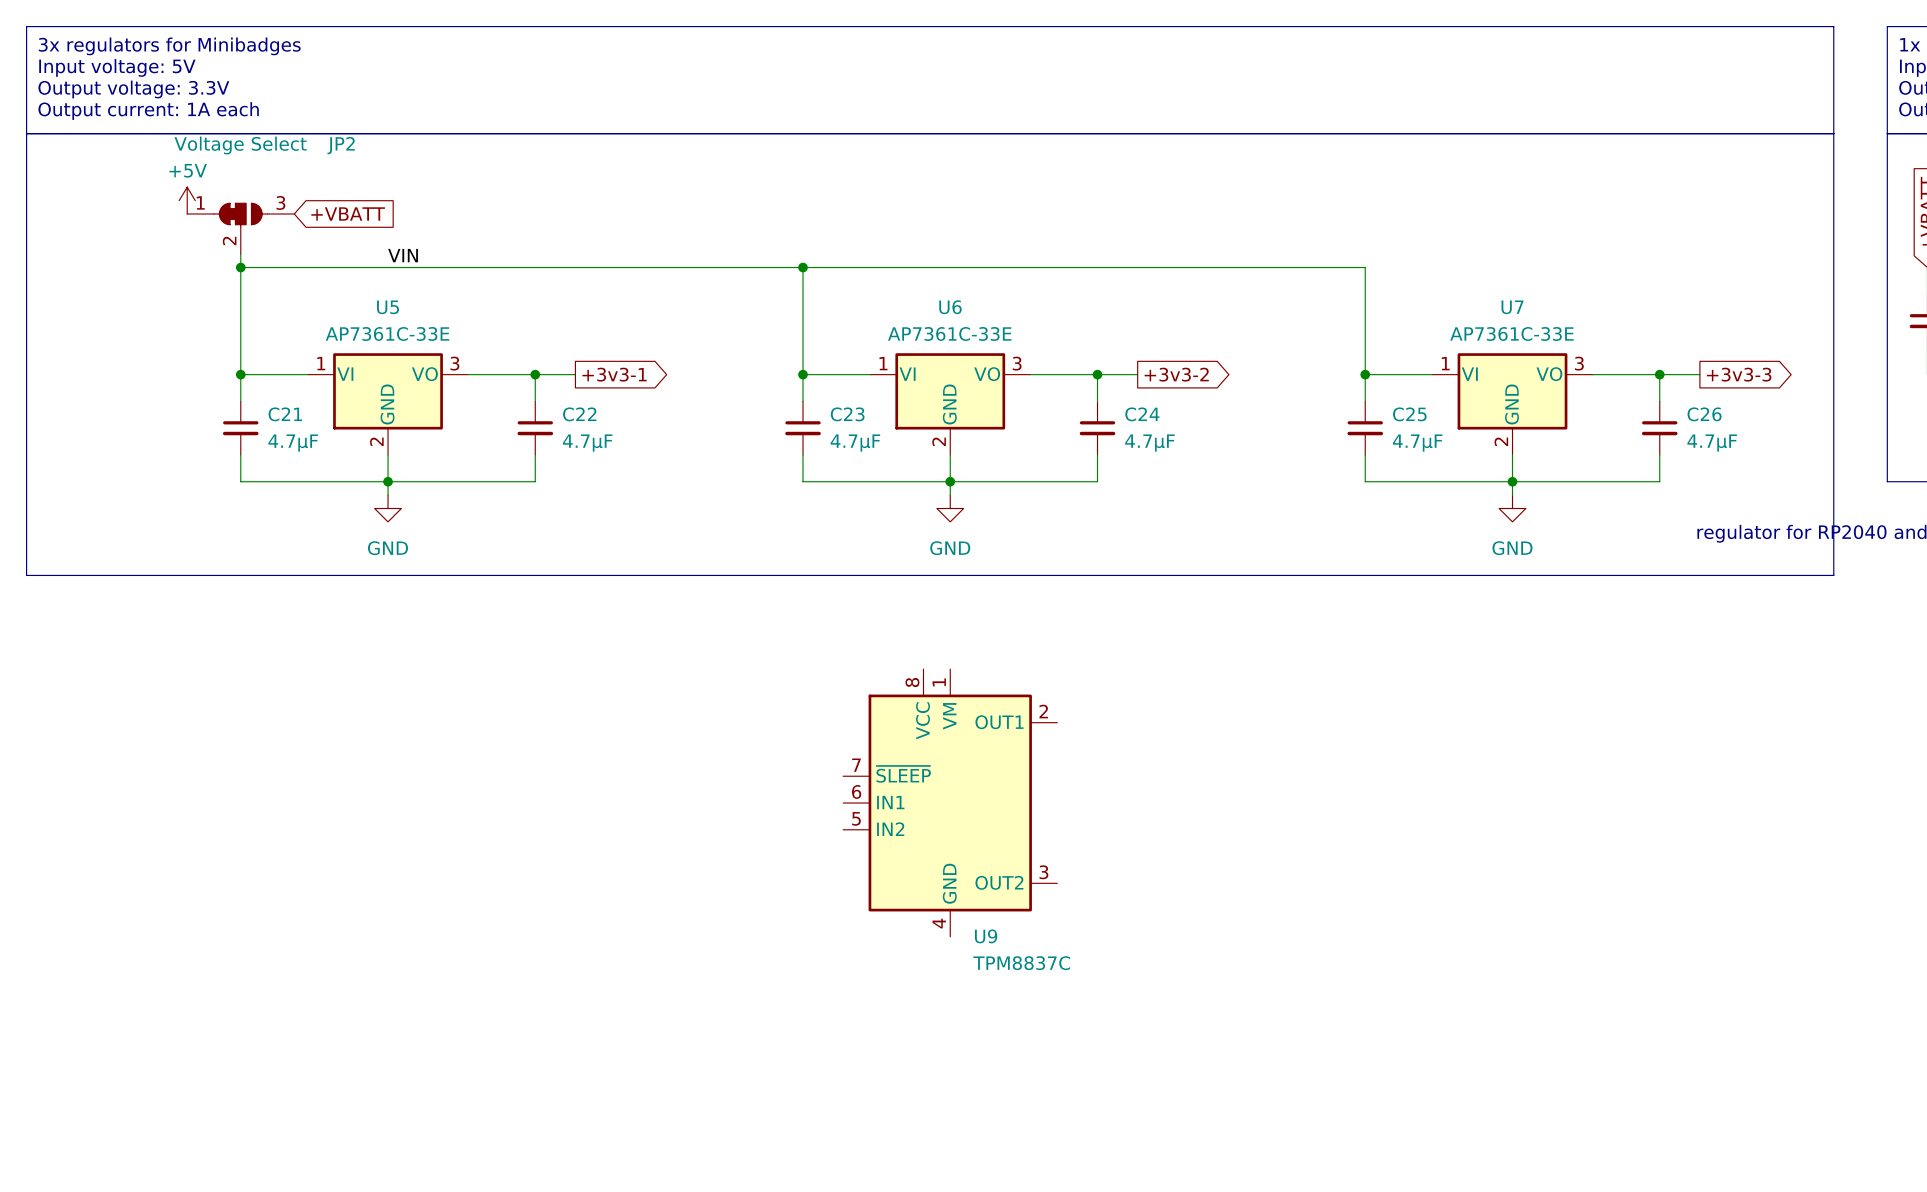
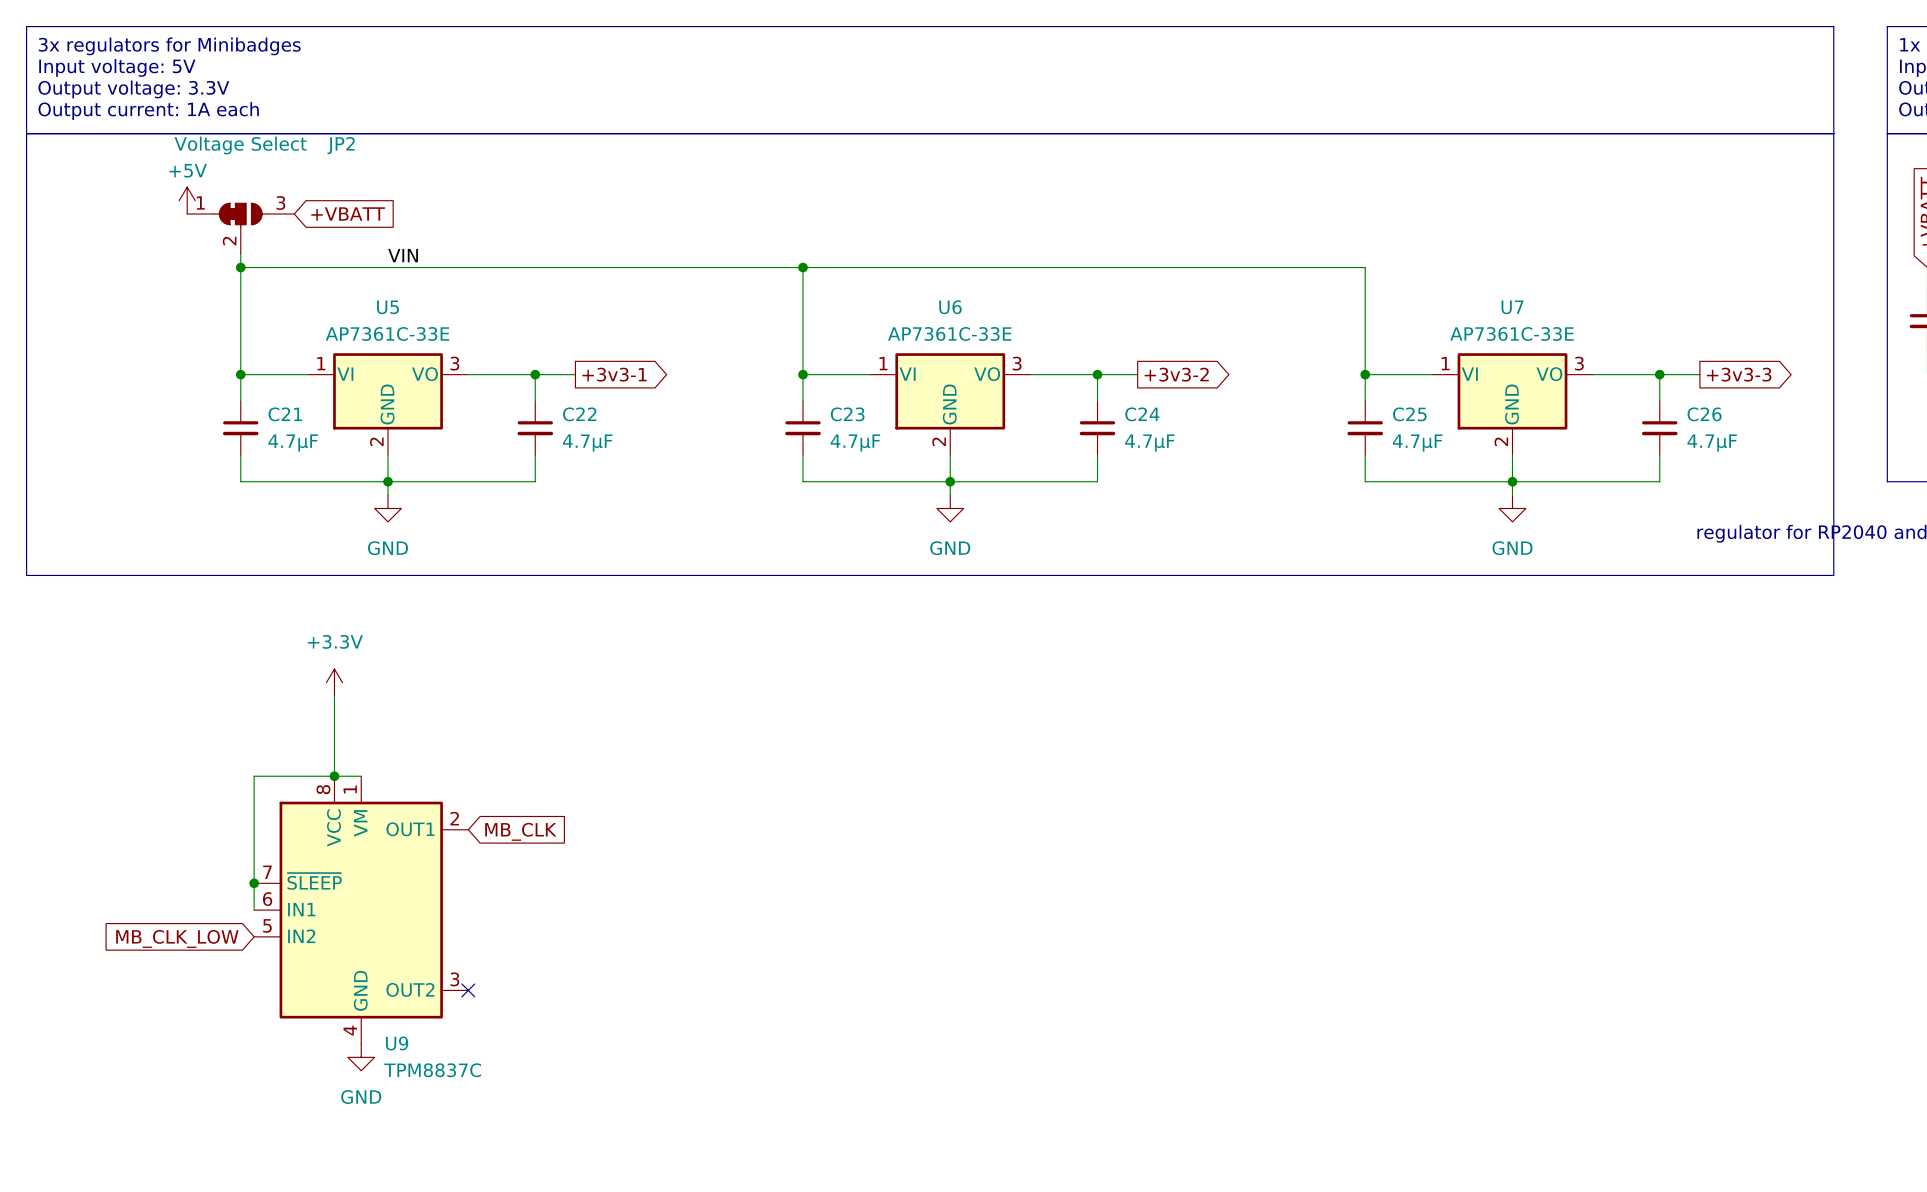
power symbol: none -> +3.3V (334, 682)
wire: none -> (334, 695) (334, 776)
junction: none -> (334, 776)
wire: none -> (361, 776) (254, 776) (254, 910)
U9 position: (950, 803) -> (361, 910)
global label: none -> MB_CLK (520, 831)
junction: none -> (254, 883)
global label: none -> MB_CLK_LOW (177, 938)
no-connect mark: none -> (468, 990)
power symbol: none -> GND (361, 1057)

